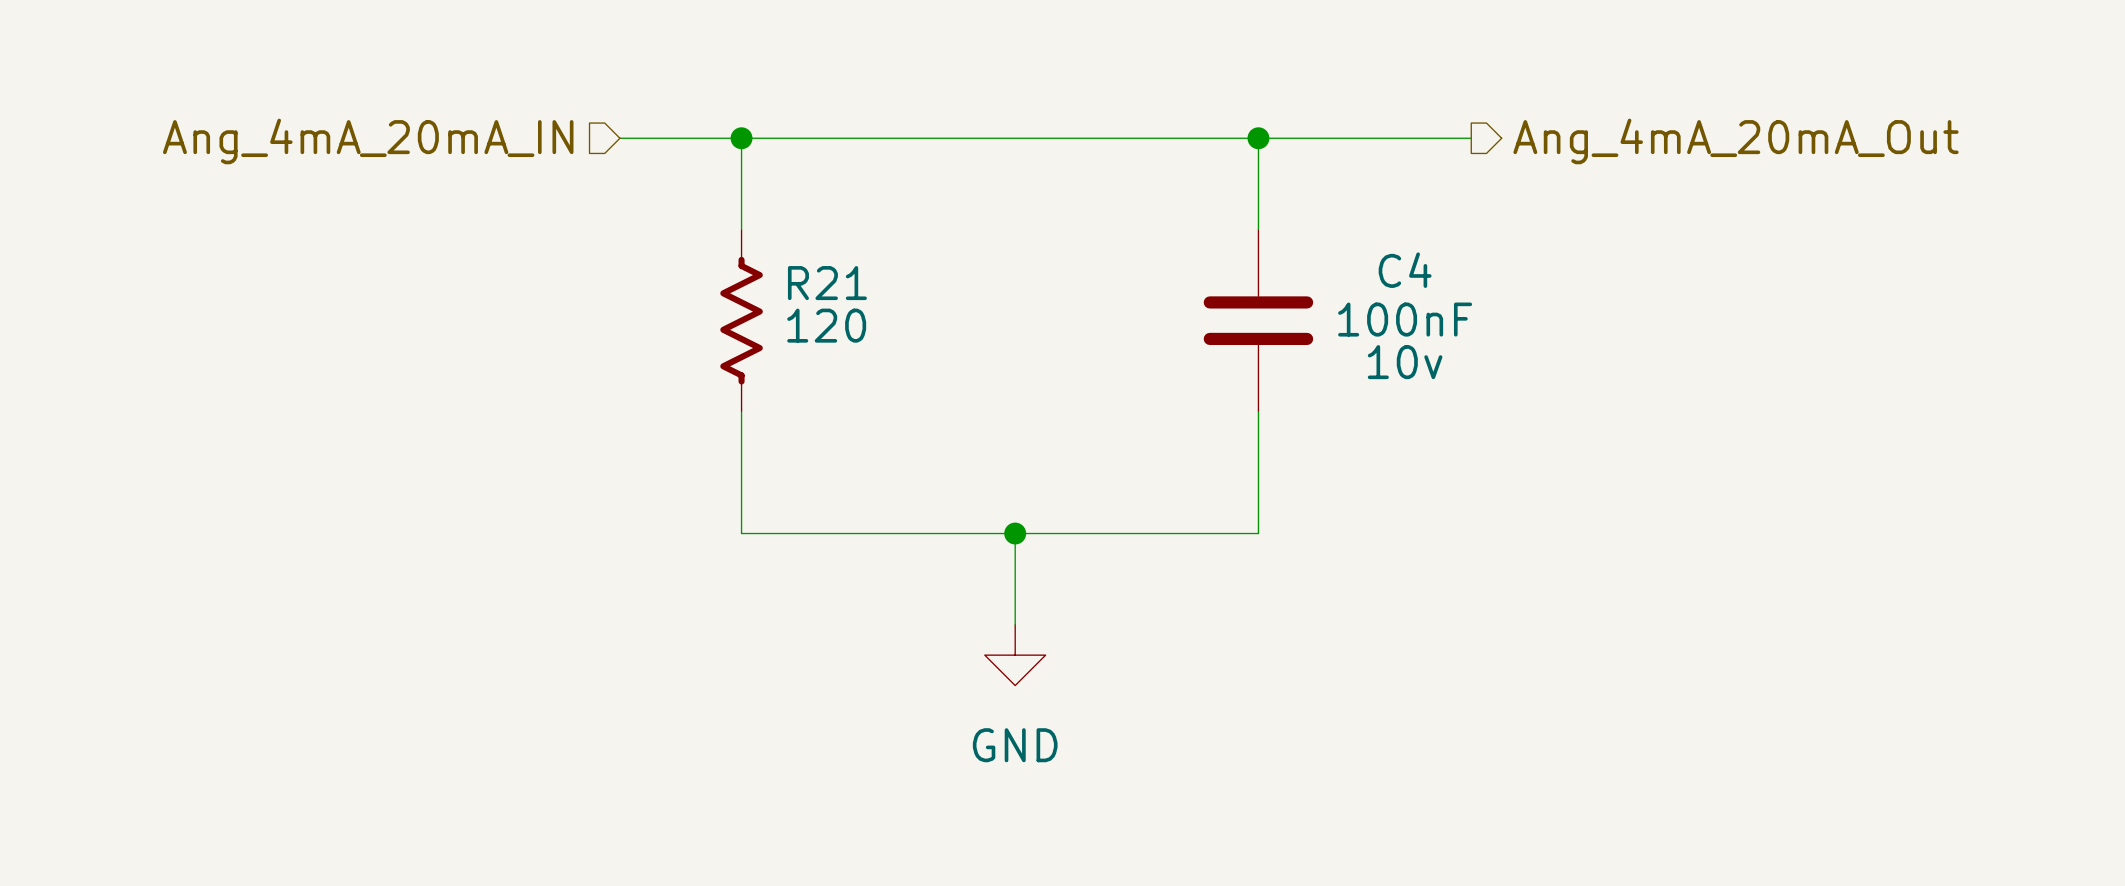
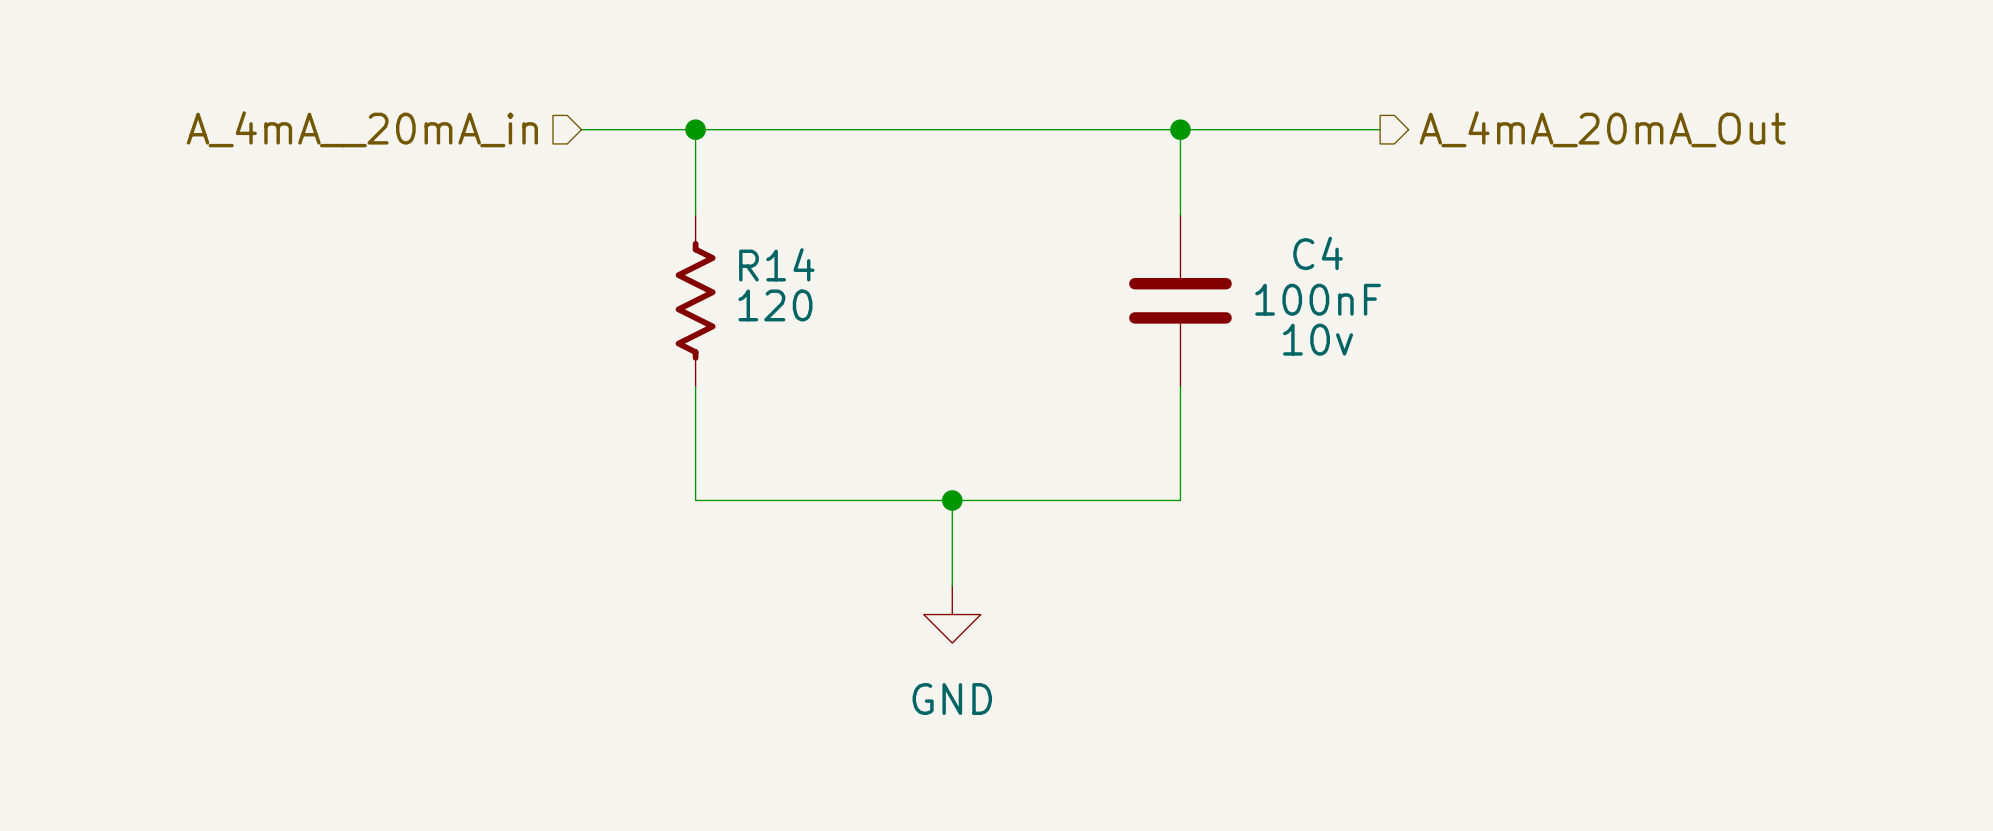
hierarchical label: Ang_4mA_20mA_IN (368, 141) -> A_4mA__20mA_in (362, 129)
hierarchical label: Ang_4mA_20mA_Out (1735, 141) -> A_4mA_20mA_Out (1602, 129)
R21 name: R21 (827, 283) -> R14 (776, 264)

